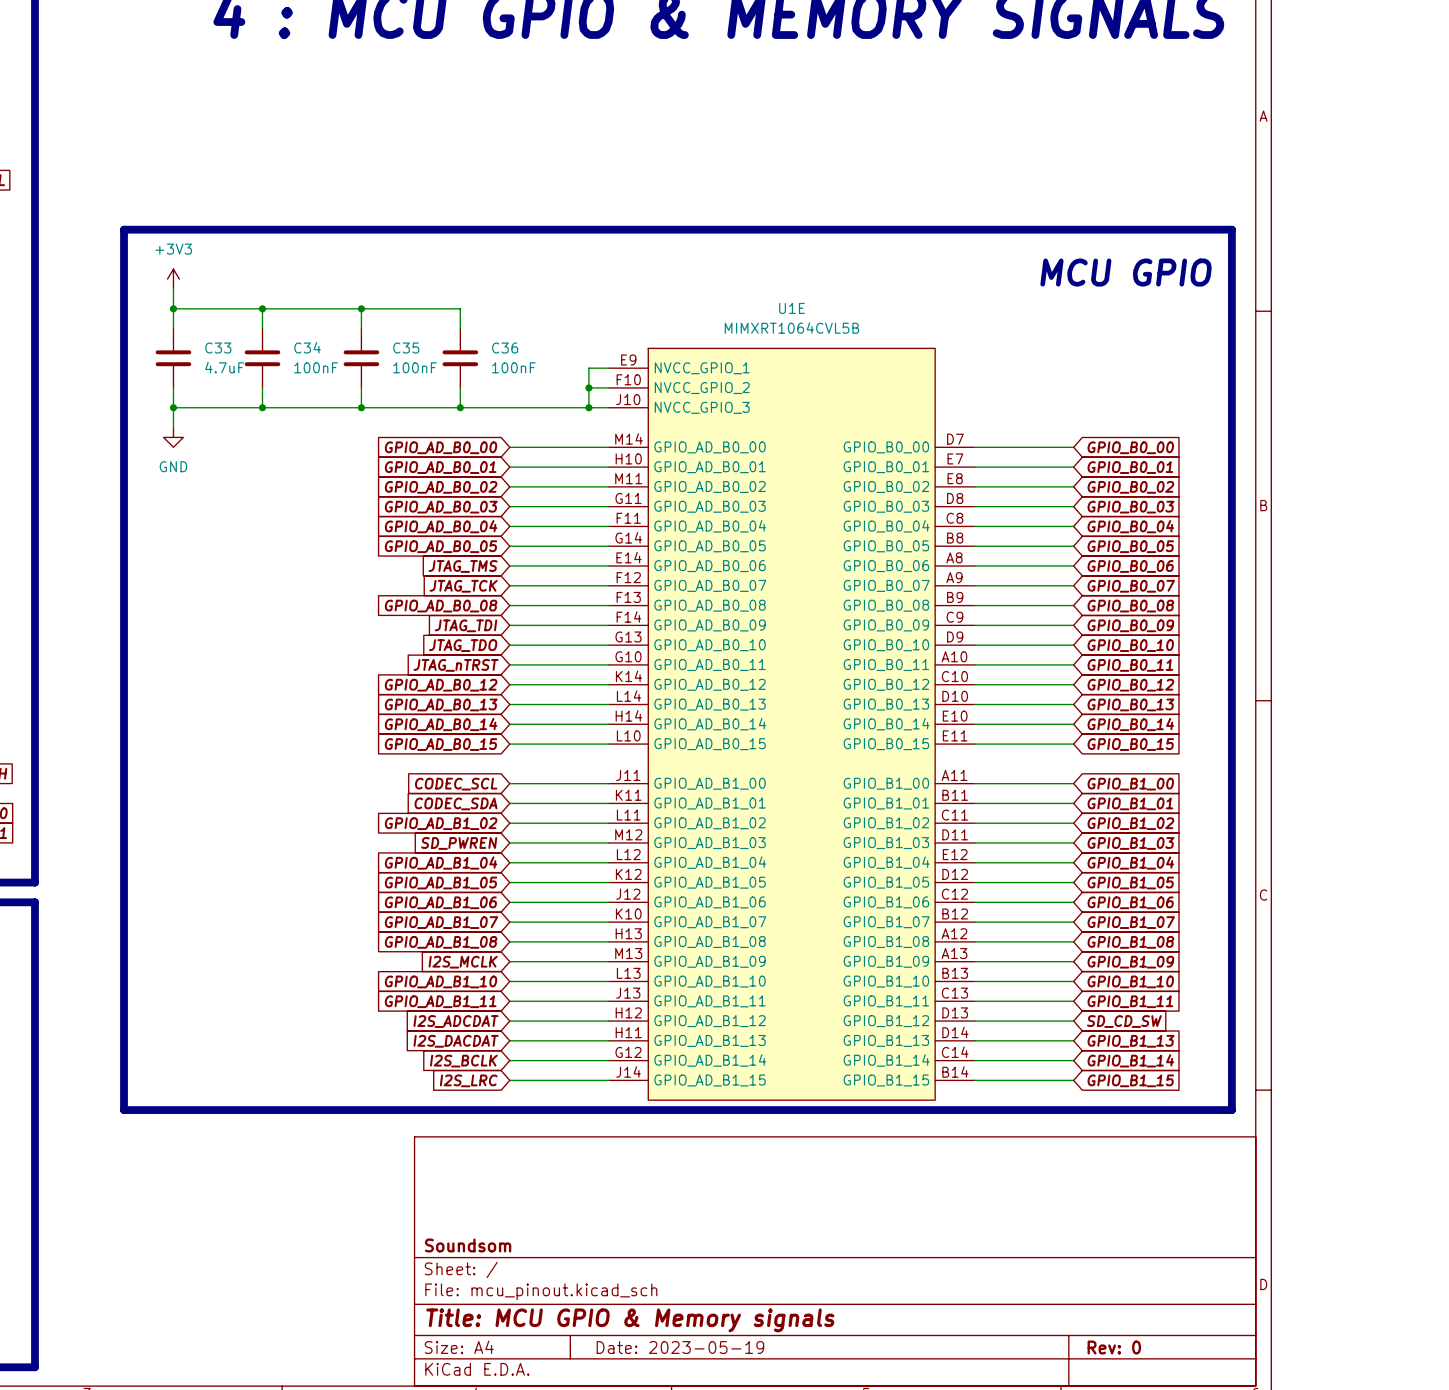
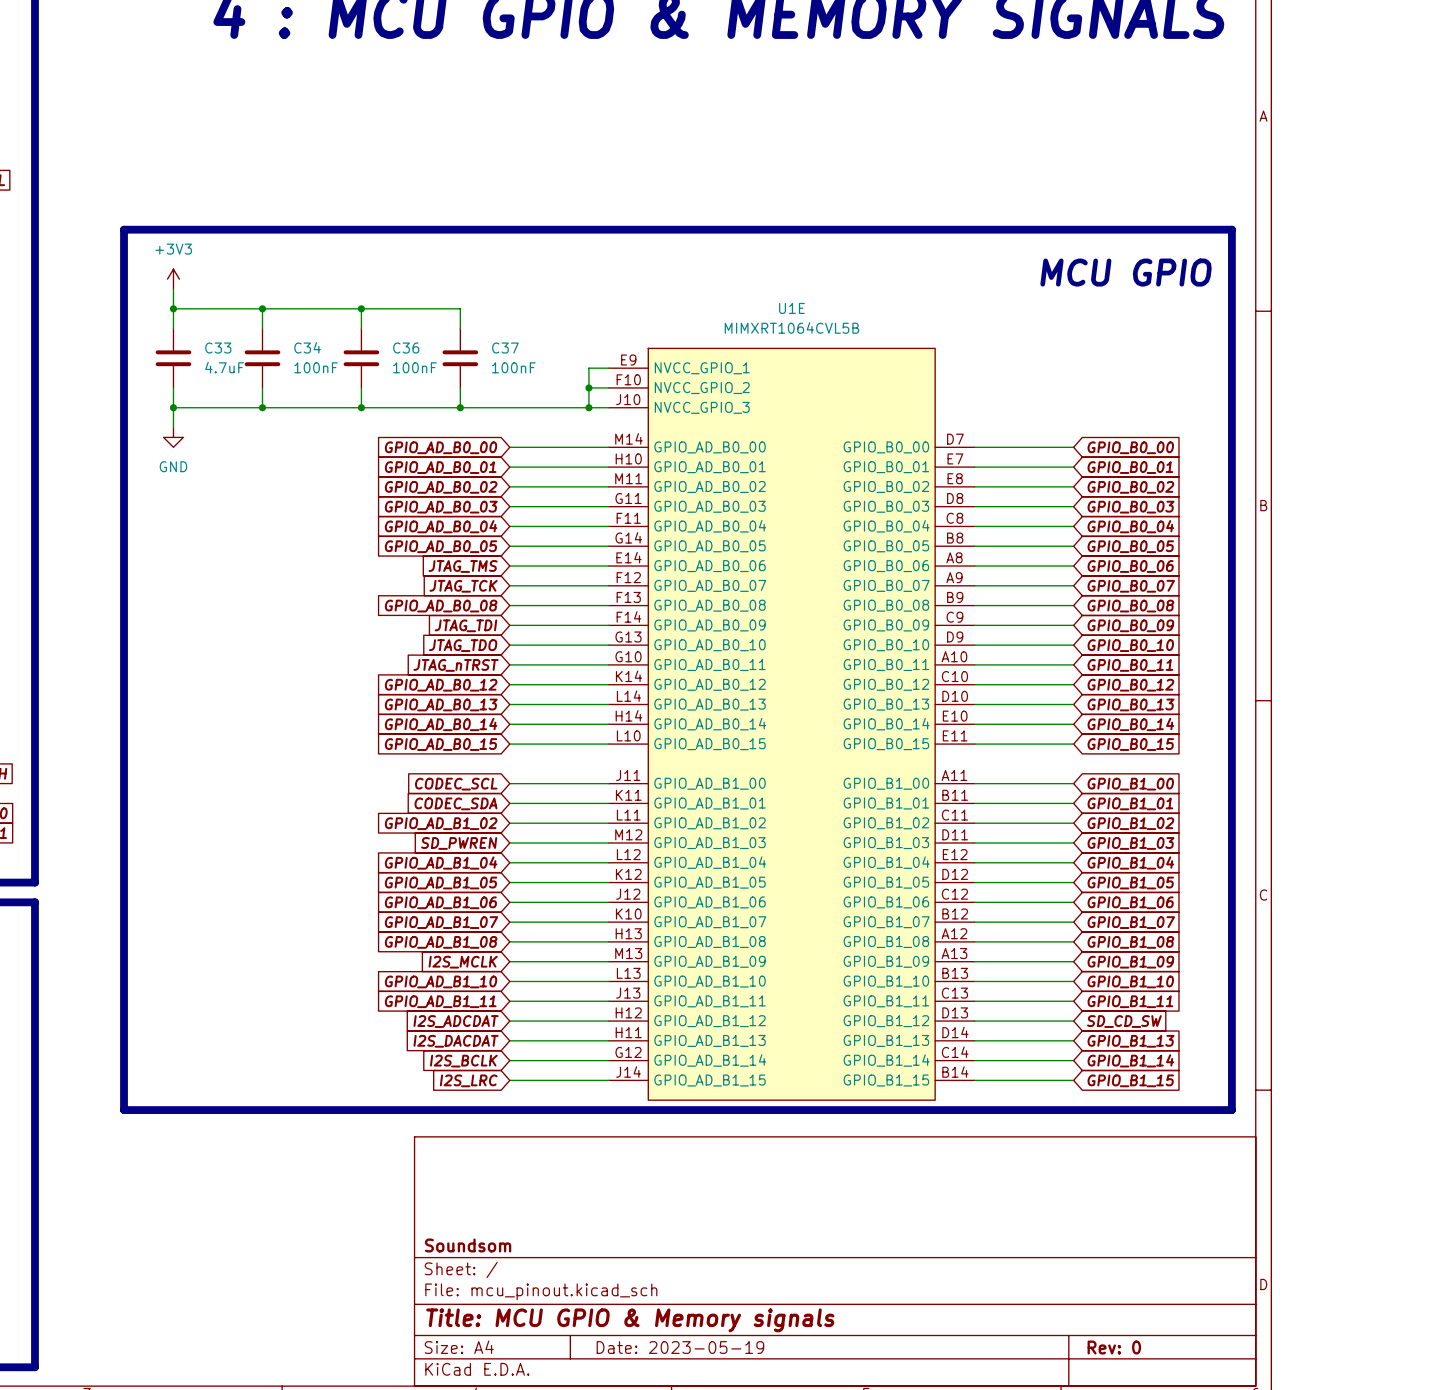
C35 name: C35 (406, 348) -> C36 (406, 348)
C36 name: C36 (505, 348) -> C37 (505, 348)

